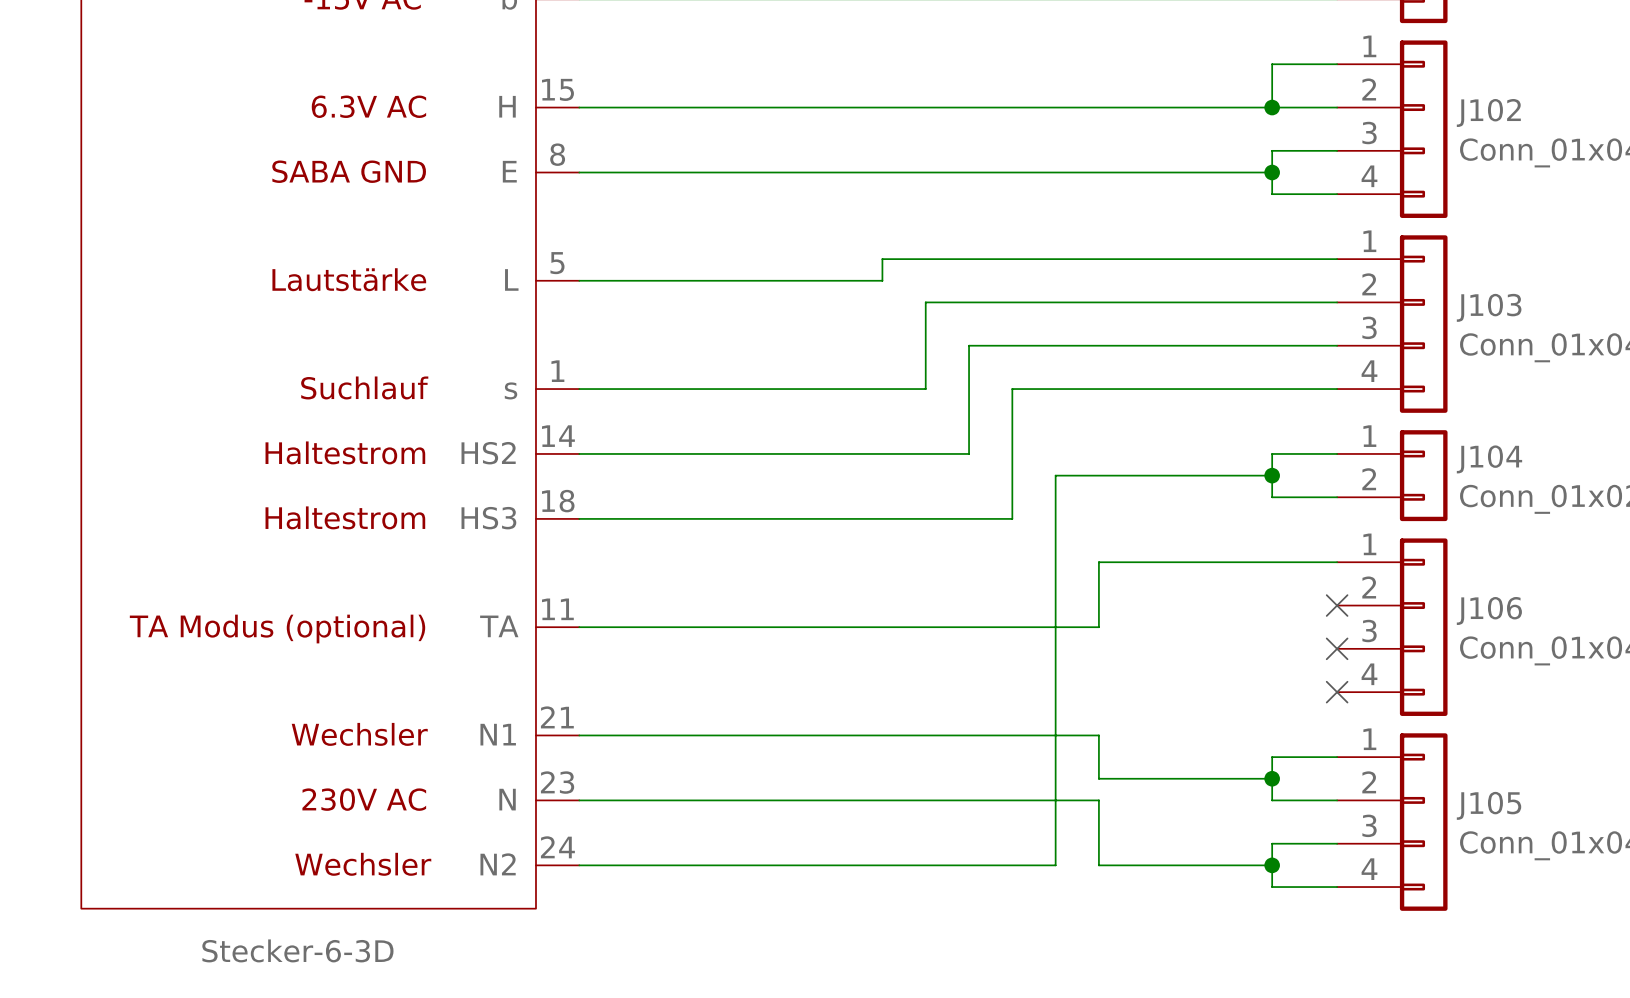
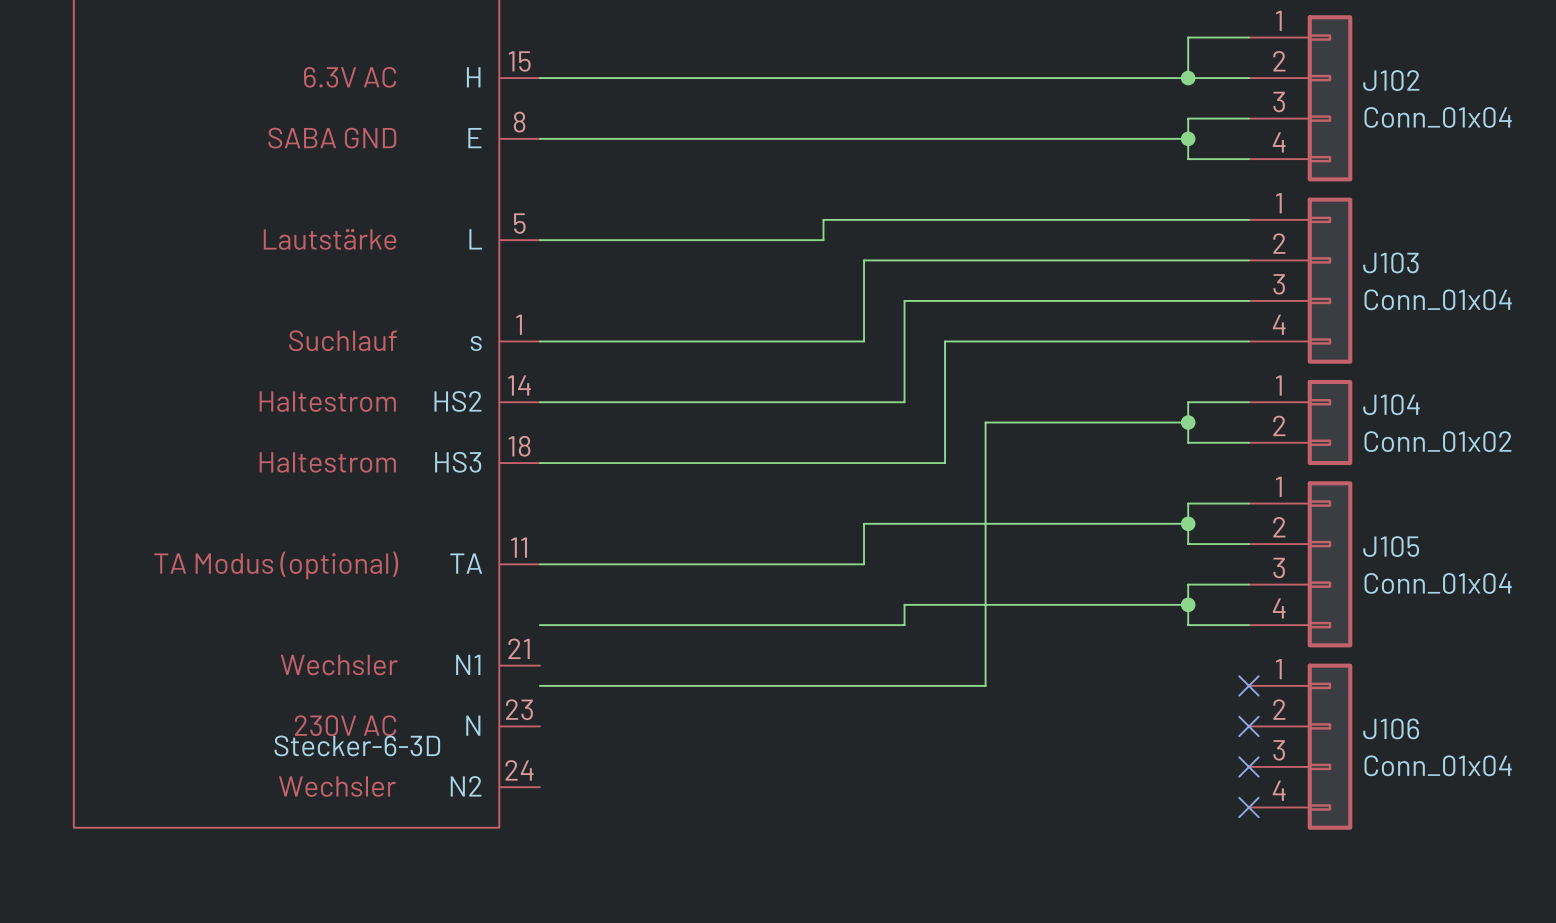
wire: (1272, 562) (1098, 562) (1098, 627) (925, 627) -> (1188, 523) (864, 523) (864, 564)
wire: none -> (1188, 503) (1188, 544) (1248, 544)
junction: none -> (1188, 523)
no-connect mark: (1337, 605) -> none
J106 name: J106 (1489, 610) -> J105 (1391, 546)
no-connect mark: (1337, 648) -> none
wire: none -> (1188, 604) (904, 604) (904, 625) (539, 625)
junction: none -> (1188, 604)
no-connect mark: (1337, 692) -> none
wire: (579, 735) (1098, 735) (1098, 778) (1272, 778) -> none
wire: (1055, 757) (1055, 865) (579, 865) -> (985, 685) (539, 685)
wire: (1337, 757) (1272, 757) (1272, 800) (1337, 800) -> (1248, 584) (1188, 584) (1188, 625) (1248, 625)
no-connect mark: none -> (1248, 685)
junction: (1272, 778) -> none
wire: (579, 800) (1098, 800) (1098, 865) (1272, 865) -> none
no-connect mark: none -> (1248, 726)
J105 name: J105 (1489, 805) -> J106 (1391, 728)
wire: (1337, 843) (1272, 843) (1272, 887) (1337, 887) -> none
no-connect mark: none -> (1248, 766)
junction: (1272, 865) -> none
no-connect mark: none -> (1248, 807)
part value position: Stecker-6-3D (297, 950) -> Stecker-6-3D (357, 745)

